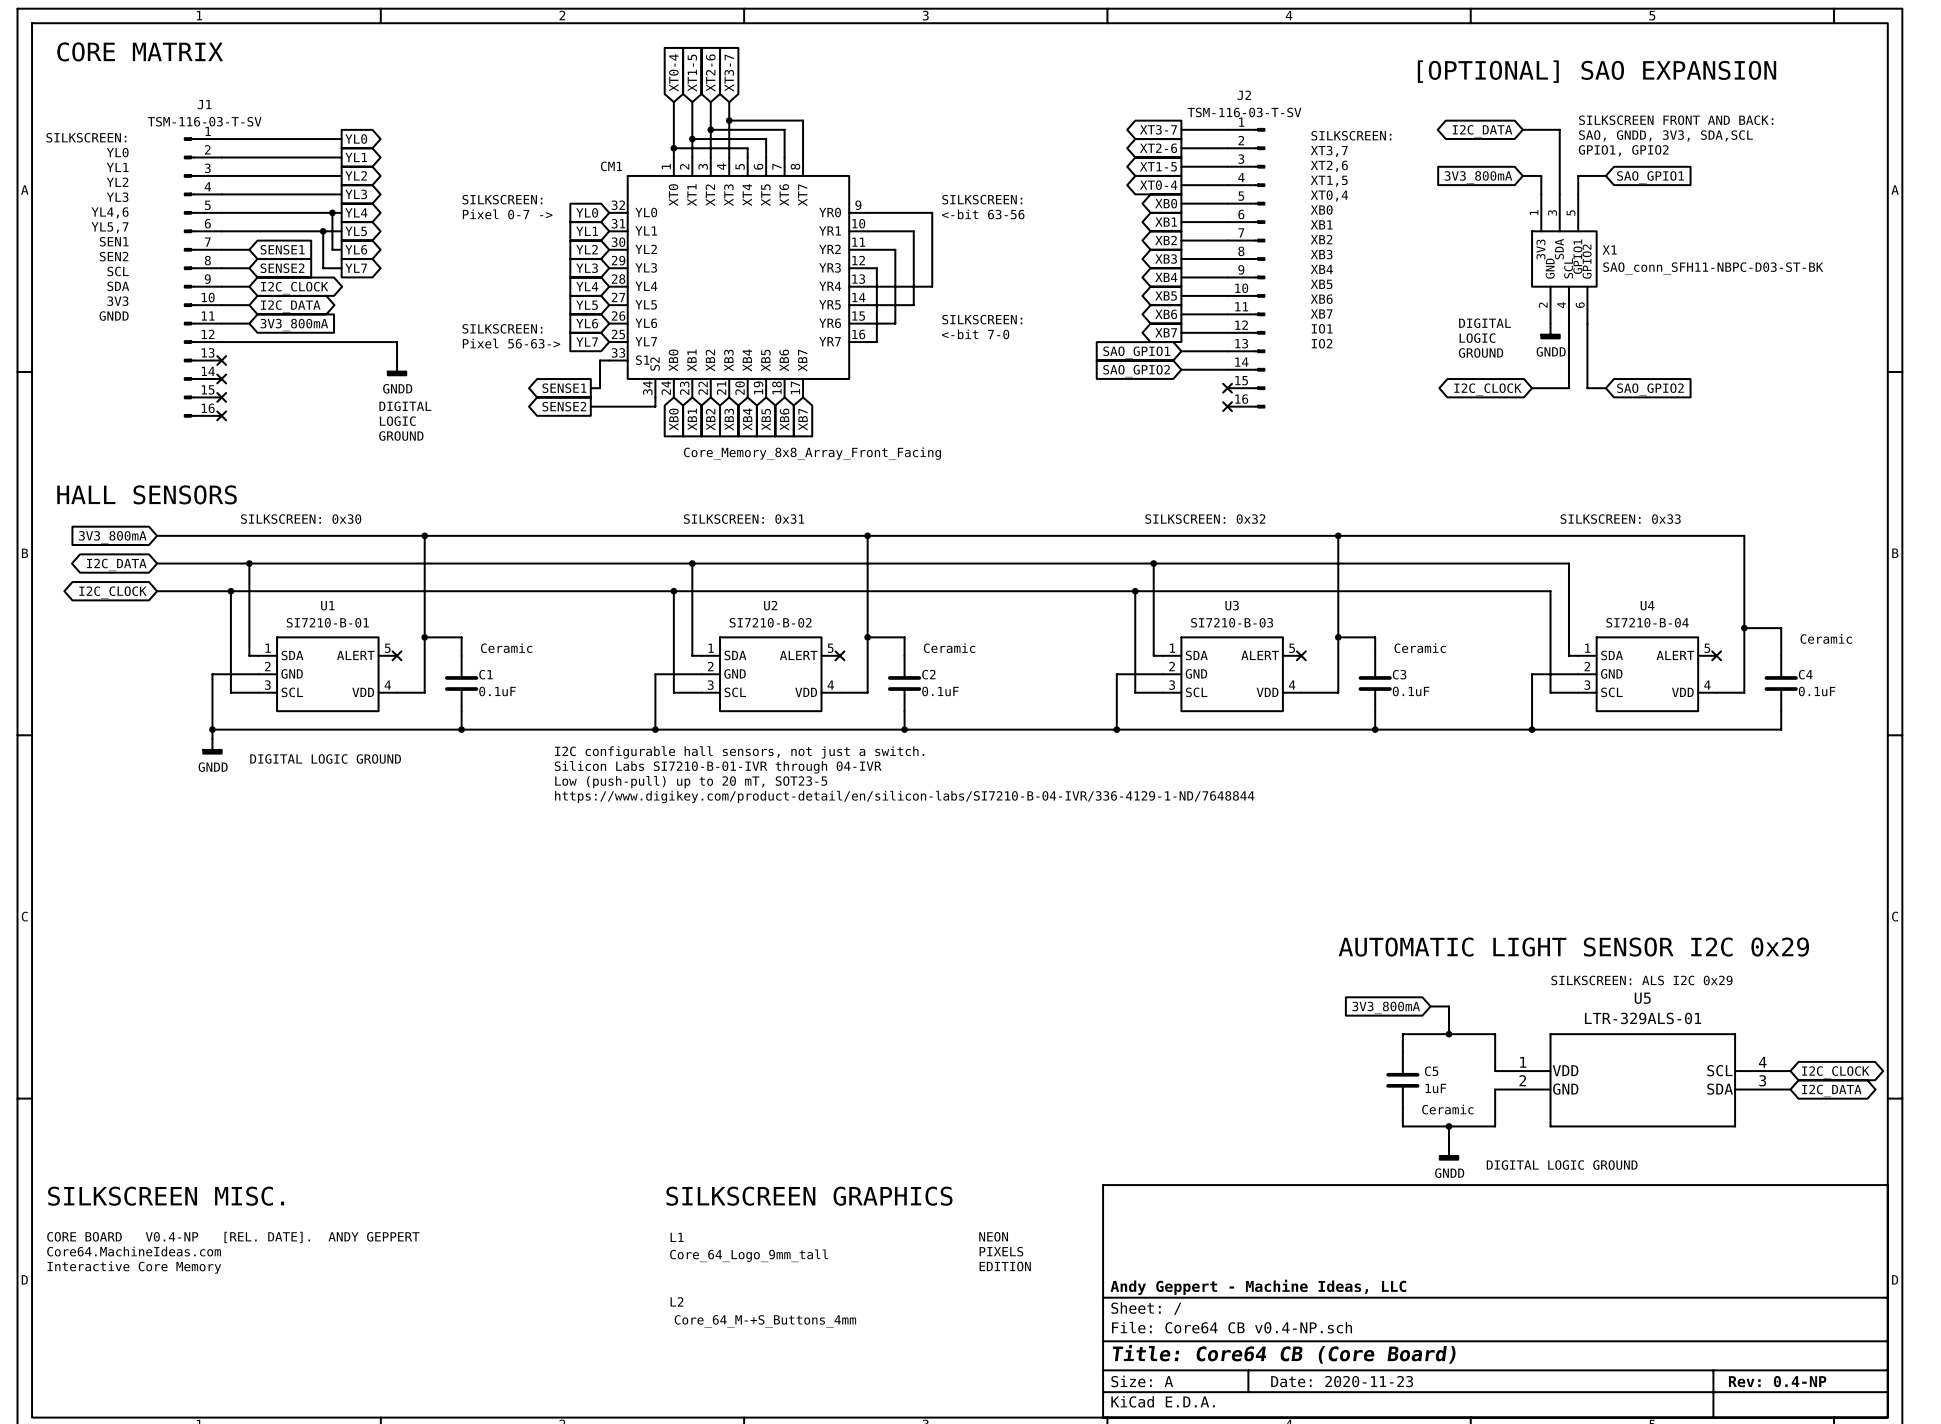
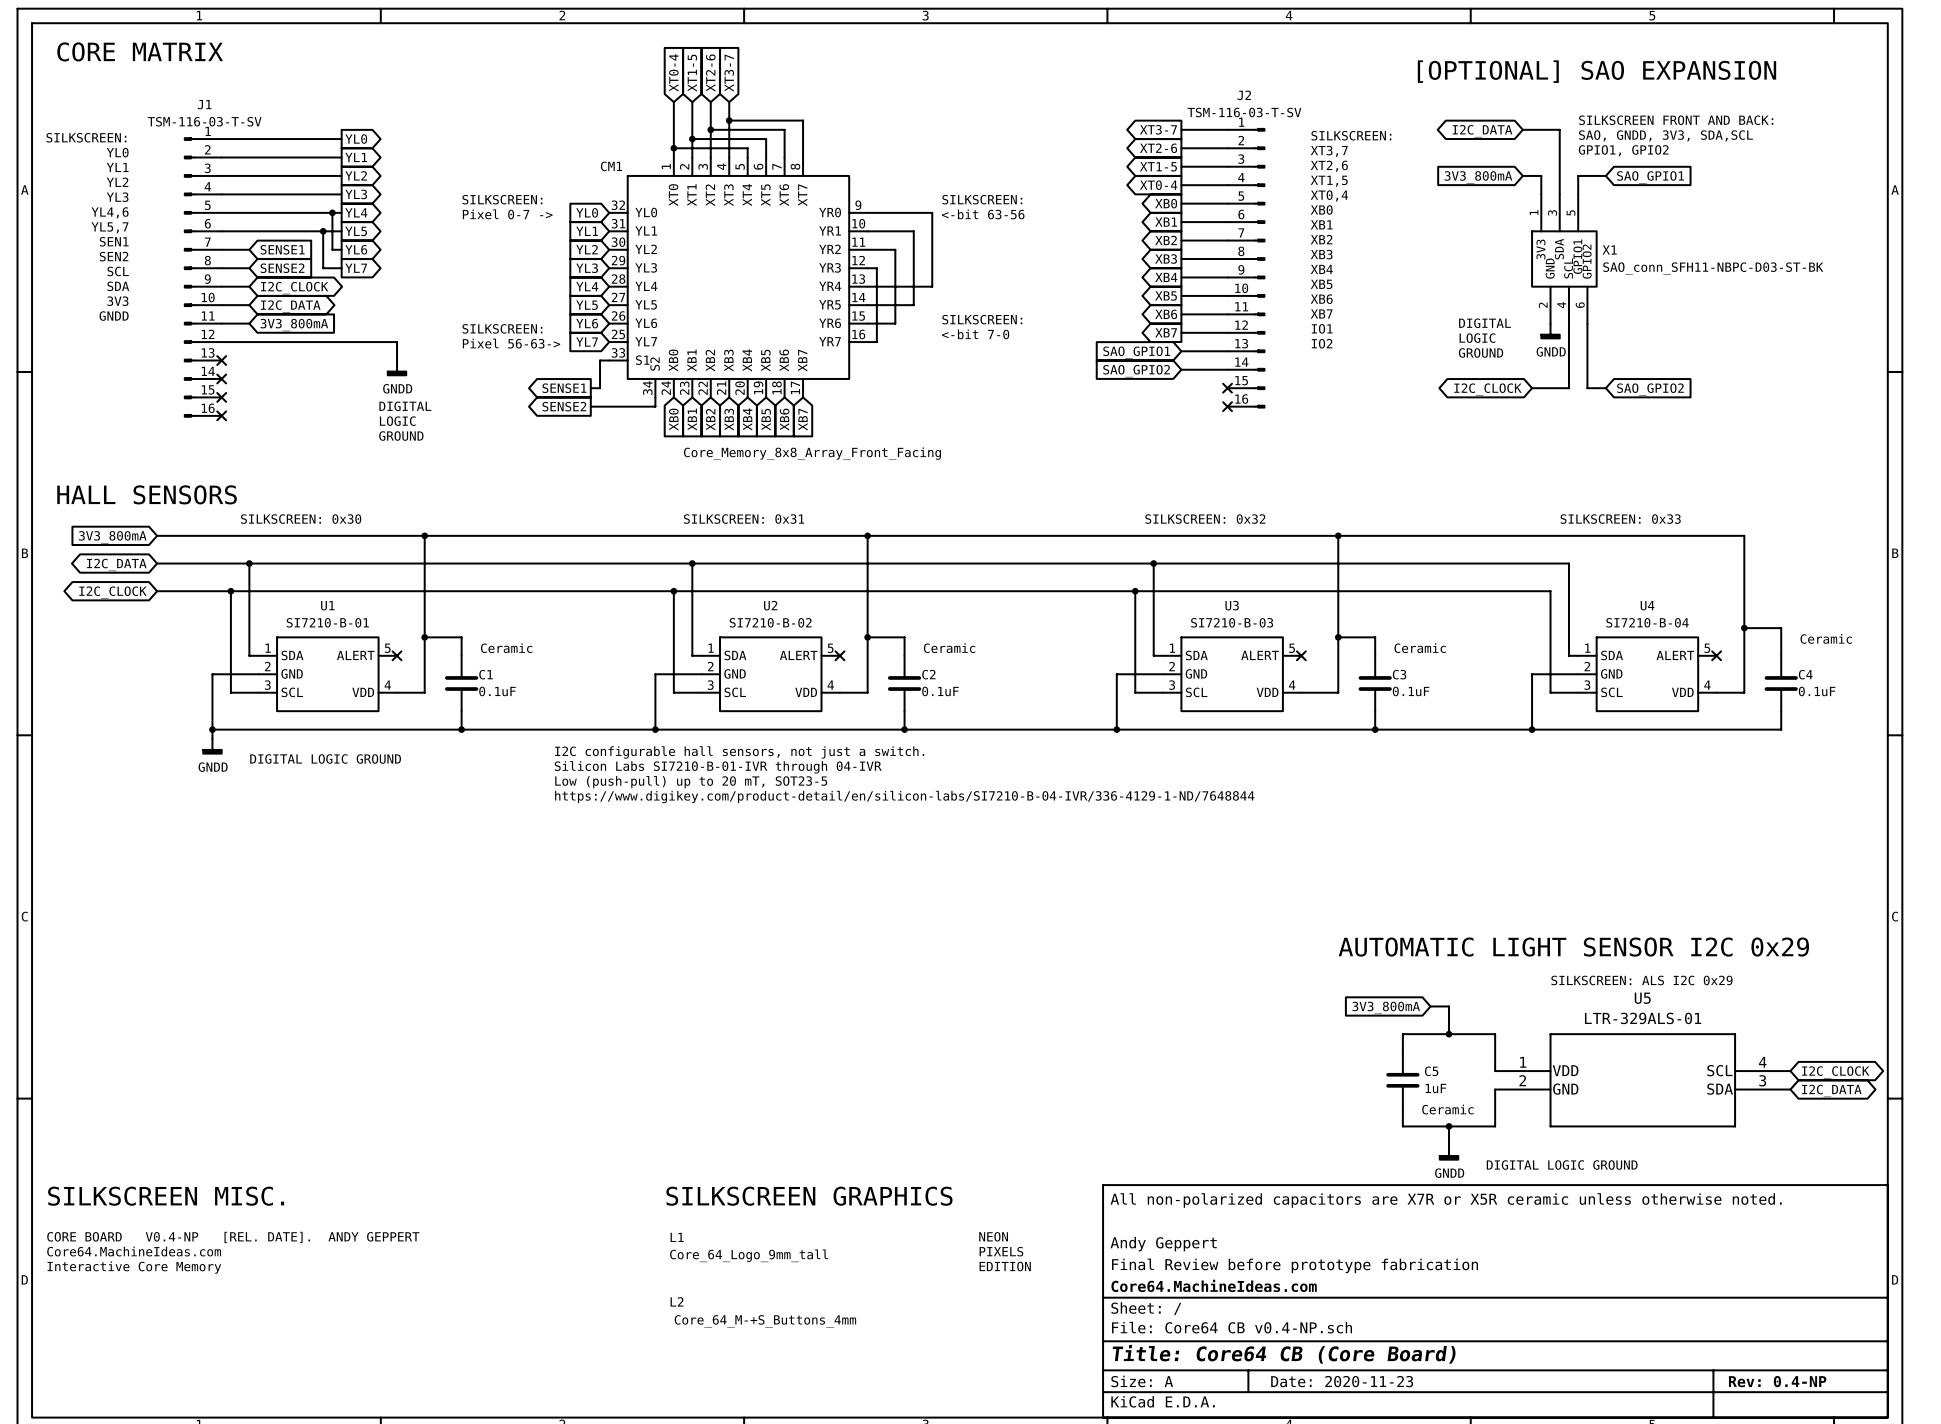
title block: none -> All non-polarized capacitors are X7R or X5R ceramic unless otherwise noted. (1446, 1200)
title block: none -> Andy Geppert (1163, 1244)
title block: none -> Final Review before prototype fabrication (1295, 1265)
title block: Andy Geppert - Machine Ideas, LLC (1258, 1287) -> Core64.MachineIdeas.com (1214, 1285)

